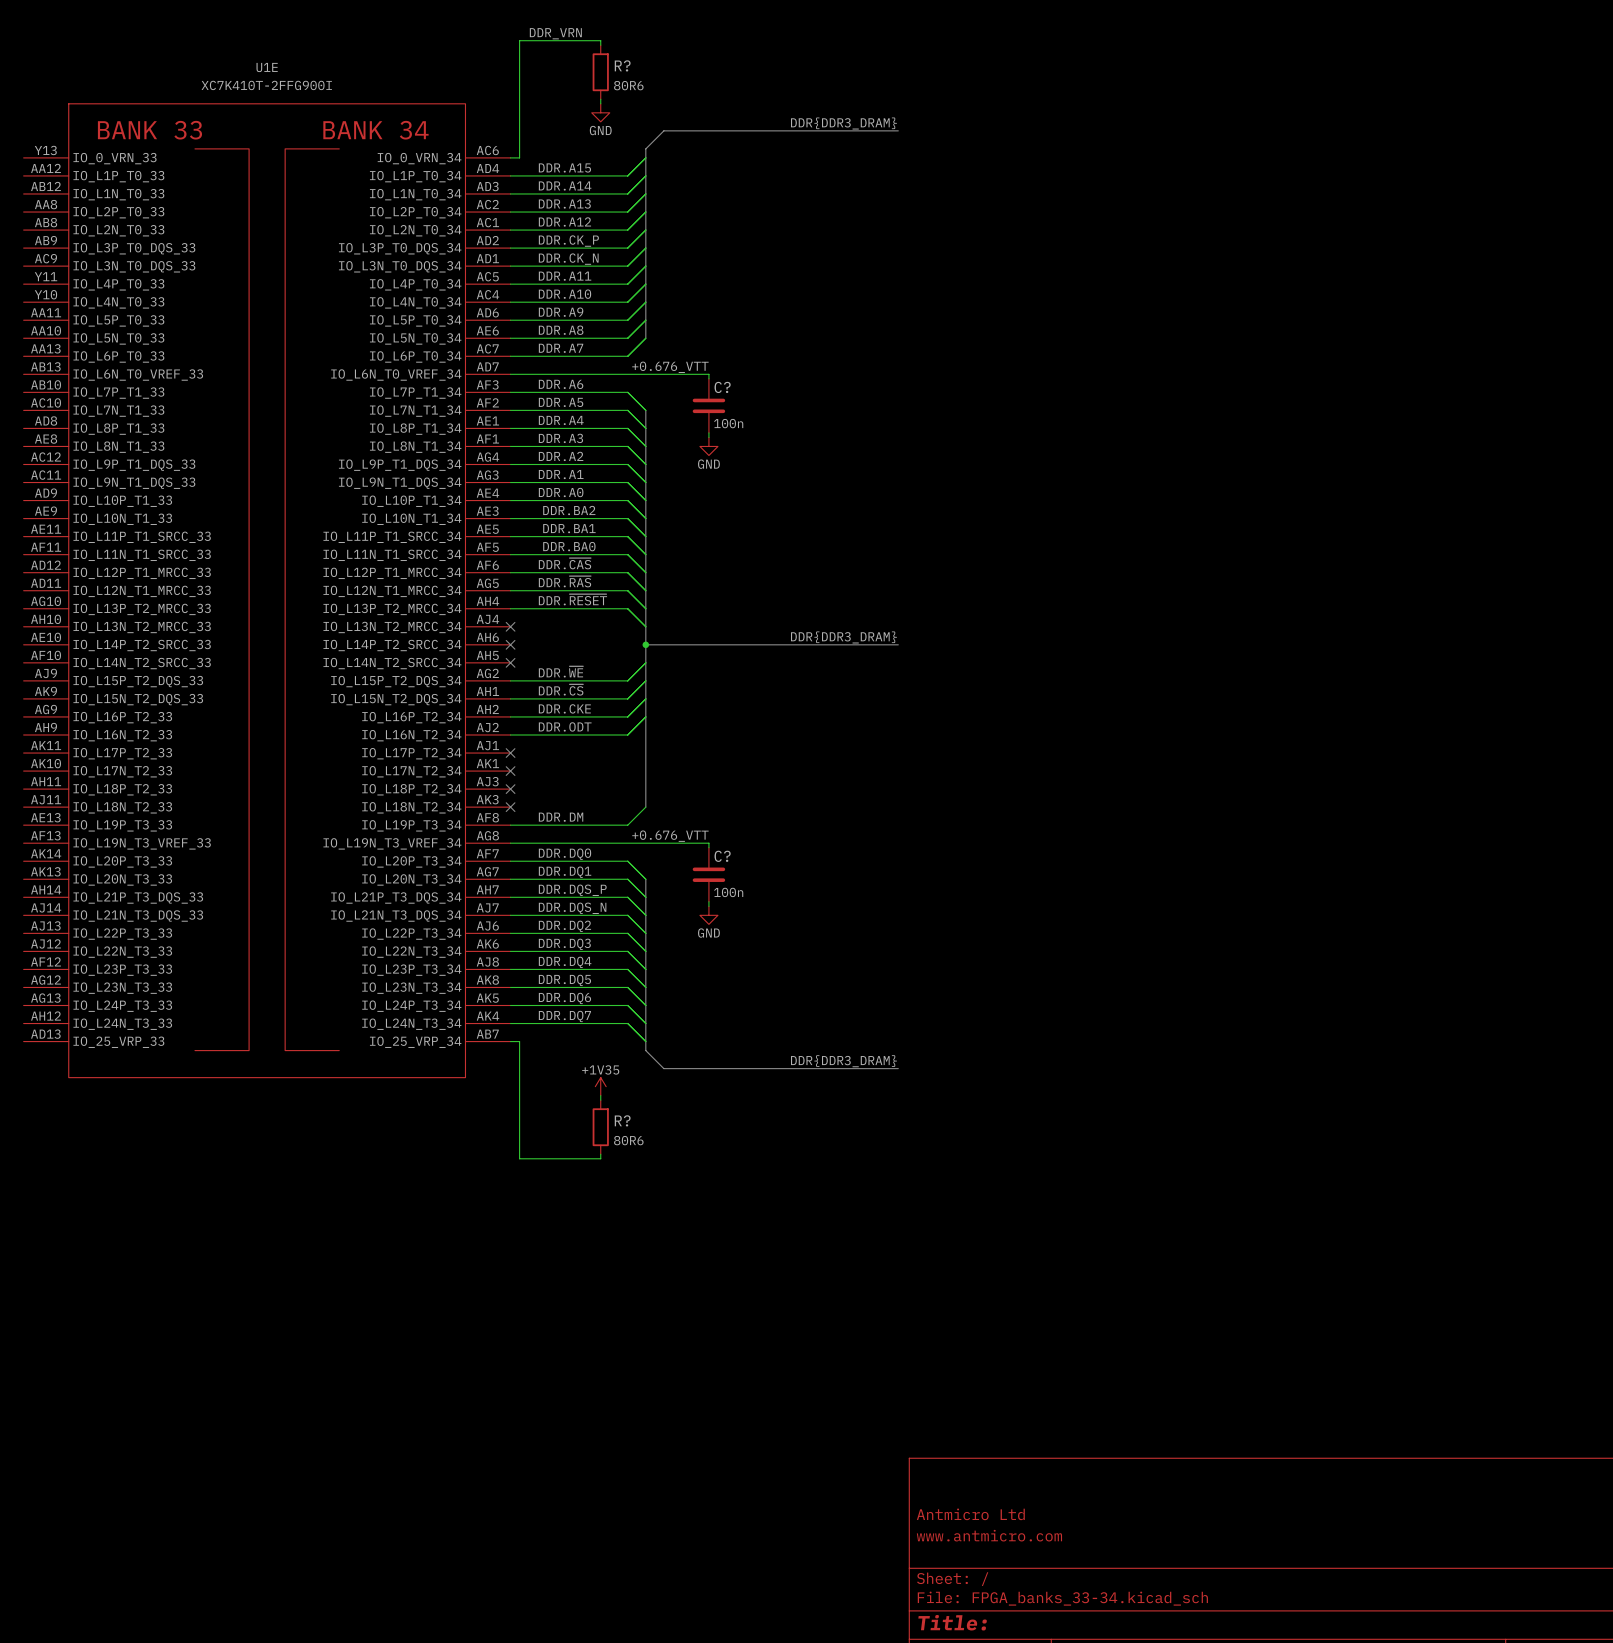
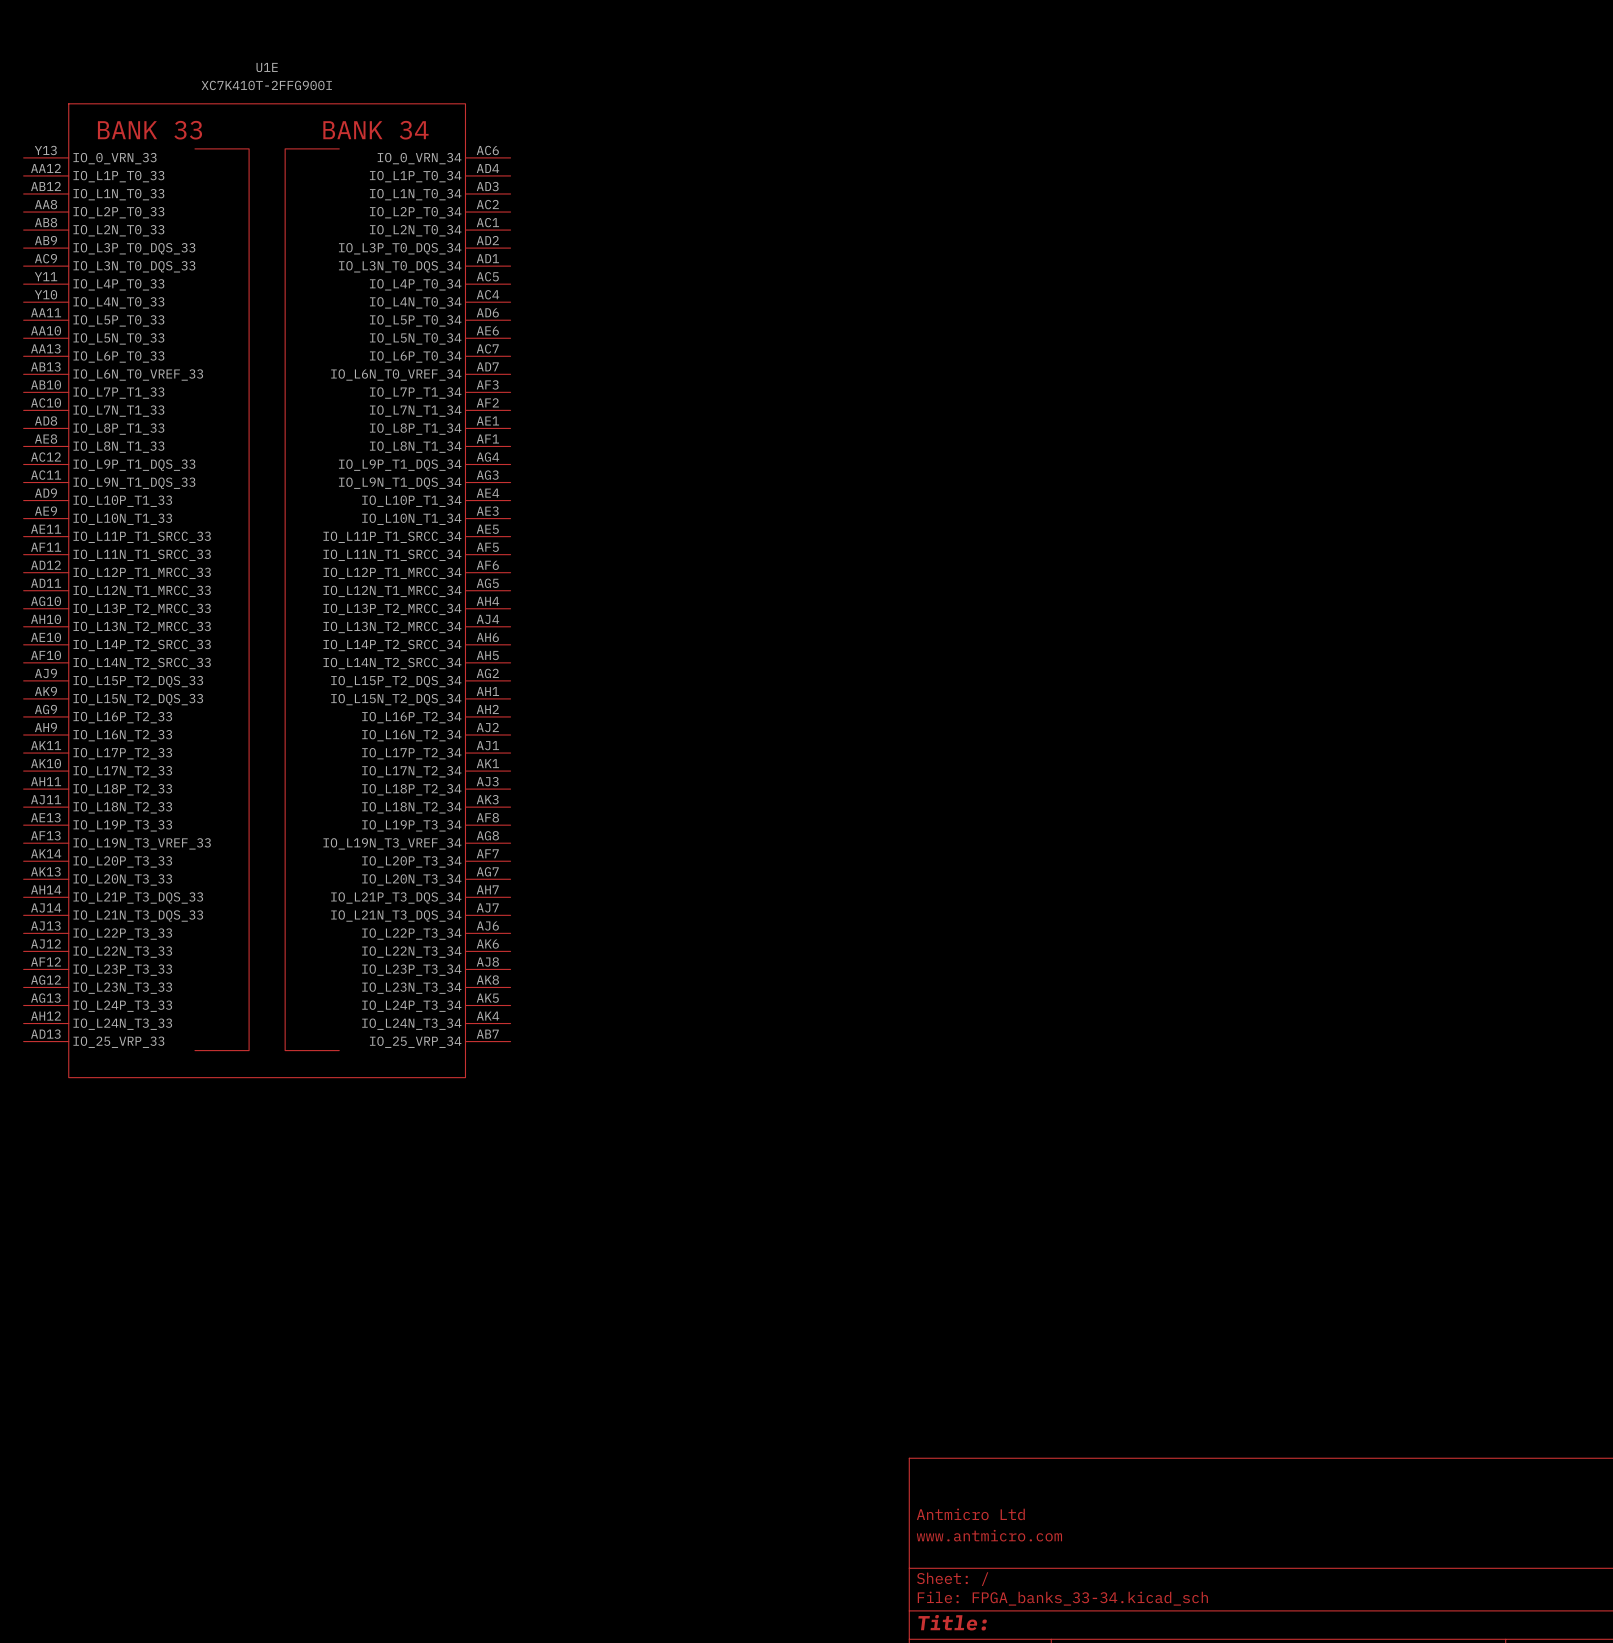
label: DDR_VRN (555, 33) -> none
wire: (600, 45) (600, 40) (519, 40) (519, 157) (510, 157) -> none
R?: (600, 72) -> none
wire: (600, 99) (600, 103) -> none
power symbol: GND (600, 112) -> none
label: DDR{DDR3_DRAM} (843, 123) -> none
bus: (898, 130) (663, 130) (645, 148) (645, 338) -> none
wire: (645, 157) (627, 175) (510, 175) -> none
label: DDR.A15 (564, 167) -> none
wire: (645, 175) (627, 193) (510, 193) -> none
label: DDR.A14 (565, 186) -> none
wire: (645, 193) (627, 212) (510, 212) -> none
label: DDR.A13 (564, 203) -> none
wire: (645, 212) (627, 230) (510, 230) -> none
label: DDR.A12 (564, 221) -> none
wire: (645, 230) (627, 248) (510, 248) -> none
label: DDR.CK_P (568, 241) -> none
wire: (645, 248) (627, 266) (510, 266) -> none
label: DDR.CK_N (568, 259) -> none
wire: (645, 266) (627, 284) (510, 284) -> none
label: DDR.A11 (565, 276) -> none
wire: (645, 284) (627, 302) (510, 302) -> none
label: DDR.A10 (565, 294) -> none
wire: (645, 302) (627, 320) (510, 320) -> none
label: DDR.A9 (561, 312) -> none
wire: (645, 320) (627, 338) (510, 338) -> none
label: DDR.A8 (561, 330) -> none
wire: (645, 338) (627, 356) (510, 356) -> none
label: DDR.A7 (561, 348) -> none
label: +0.676_VTT (670, 367) -> none
wire: (510, 374) (708, 374) (708, 378) -> none
label: DDR.A6 (561, 384) -> none
wire: (510, 392) (627, 392) (645, 410) -> none
label: DDR.A5 (561, 402) -> none
C?: (708, 405) -> none
wire: (510, 410) (627, 410) (645, 428) -> none
bus: (645, 410) (645, 807) -> none
label: DDR.A4 (561, 420) -> none
wire: (510, 428) (627, 428) (645, 446) -> none
wire: (708, 432) (708, 437) -> none
label: DDR.A3 (560, 438) -> none
wire: (510, 446) (627, 446) (645, 464) -> none
power symbol: GND (708, 446) -> none
label: DDR.A2 (561, 456) -> none
wire: (510, 464) (627, 464) (645, 482) -> none
label: DDR.A1 (561, 474) -> none
wire: (510, 482) (627, 482) (645, 500) -> none
label: DDR.A0 (561, 492) -> none
wire: (510, 500) (627, 500) (645, 518) -> none
label: DDR.BA2 (569, 510) -> none
wire: (510, 518) (627, 518) (645, 536) -> none
label: DDR.BA1 (569, 528) -> none
wire: (510, 536) (627, 536) (645, 554) -> none
label: DDR.BA0 (569, 546) -> none
wire: (510, 554) (627, 554) (645, 572) -> none
label: DDR.~{CAS} (564, 563) -> none
wire: (510, 572) (627, 572) (645, 590) -> none
label: DDR.~{RAS} (564, 581) -> none
wire: (510, 590) (627, 590) (645, 608) -> none
label: DDR.~{RESET} (572, 599) -> none
wire: (510, 608) (627, 608) (645, 626) -> none
no-connect mark: (510, 626) -> none
label: DDR{DDR3_DRAM} (843, 637) -> none
no-connect mark: (510, 644) -> none
bus: (645, 644) (898, 644) -> none
junction: (645, 644) -> none
no-connect mark: (510, 662) -> none
wire: (645, 662) (627, 680) (510, 680) -> none
label: DDR.~{WE} (561, 671) -> none
wire: (645, 680) (627, 698) (510, 698) -> none
label: DDR.~{CS} (561, 689) -> none
wire: (645, 698) (627, 716) (510, 716) -> none
label: DDR.CKE (564, 708) -> none
wire: (645, 716) (627, 734) (510, 734) -> none
label: DDR.ODT (565, 726) -> none
no-connect mark: (510, 753) -> none
no-connect mark: (510, 771) -> none
no-connect mark: (510, 789) -> none
no-connect mark: (510, 807) -> none
wire: (645, 807) (627, 825) (510, 825) -> none
label: DDR.DM (561, 817) -> none
label: +0.676_VTT (670, 836) -> none
wire: (510, 843) (708, 843) (708, 847) -> none
label: DDR.DQ0 (565, 854) -> none
wire: (510, 861) (627, 861) (645, 879) -> none
label: DDR.DQ1 (565, 872) -> none
C?: (708, 874) -> none
wire: (510, 879) (627, 879) (645, 897) -> none
bus: (645, 879) (645, 1050) (663, 1068) (898, 1068) -> none
label: DDR.DQS_P (572, 890) -> none
wire: (510, 897) (627, 897) (645, 915) -> none
wire: (708, 901) (708, 906) -> none
label: DDR.DQS_N (572, 908) -> none
wire: (510, 915) (627, 915) (645, 933) -> none
power symbol: GND (708, 915) -> none
label: DDR.DQ2 (564, 926) -> none
wire: (510, 933) (627, 933) (645, 951) -> none
label: DDR.DQ3 (564, 944) -> none
wire: (510, 951) (627, 951) (645, 969) -> none
label: DDR.DQ4 (565, 962) -> none
wire: (510, 969) (627, 969) (645, 987) -> none
label: DDR.DQ5 (564, 980) -> none
wire: (510, 987) (627, 987) (645, 1005) -> none
label: DDR.DQ6 (564, 998) -> none
wire: (510, 1005) (627, 1005) (645, 1023) -> none
label: DDR.DQ7 (564, 1016) -> none
wire: (510, 1023) (627, 1023) (645, 1041) -> none
wire: (510, 1041) (519, 1041) (519, 1158) (600, 1158) (600, 1154) -> none
label: DDR{DDR3_DRAM} (843, 1061) -> none
power symbol: +1V35 (600, 1086) -> none
wire: (600, 1095) (600, 1100) -> none
R?: (600, 1127) -> none

